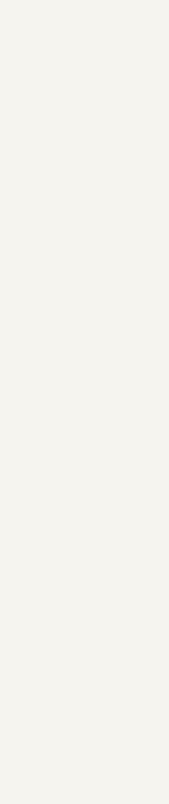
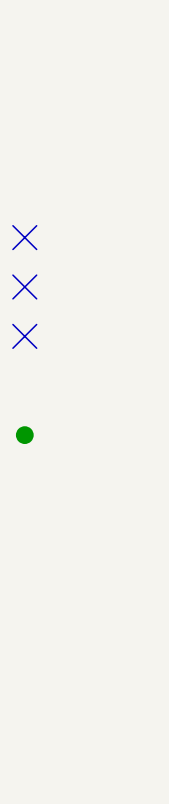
no-connect mark: none -> (24, 237)
no-connect mark: none -> (24, 286)
no-connect mark: none -> (24, 336)
junction: none -> (24, 435)

